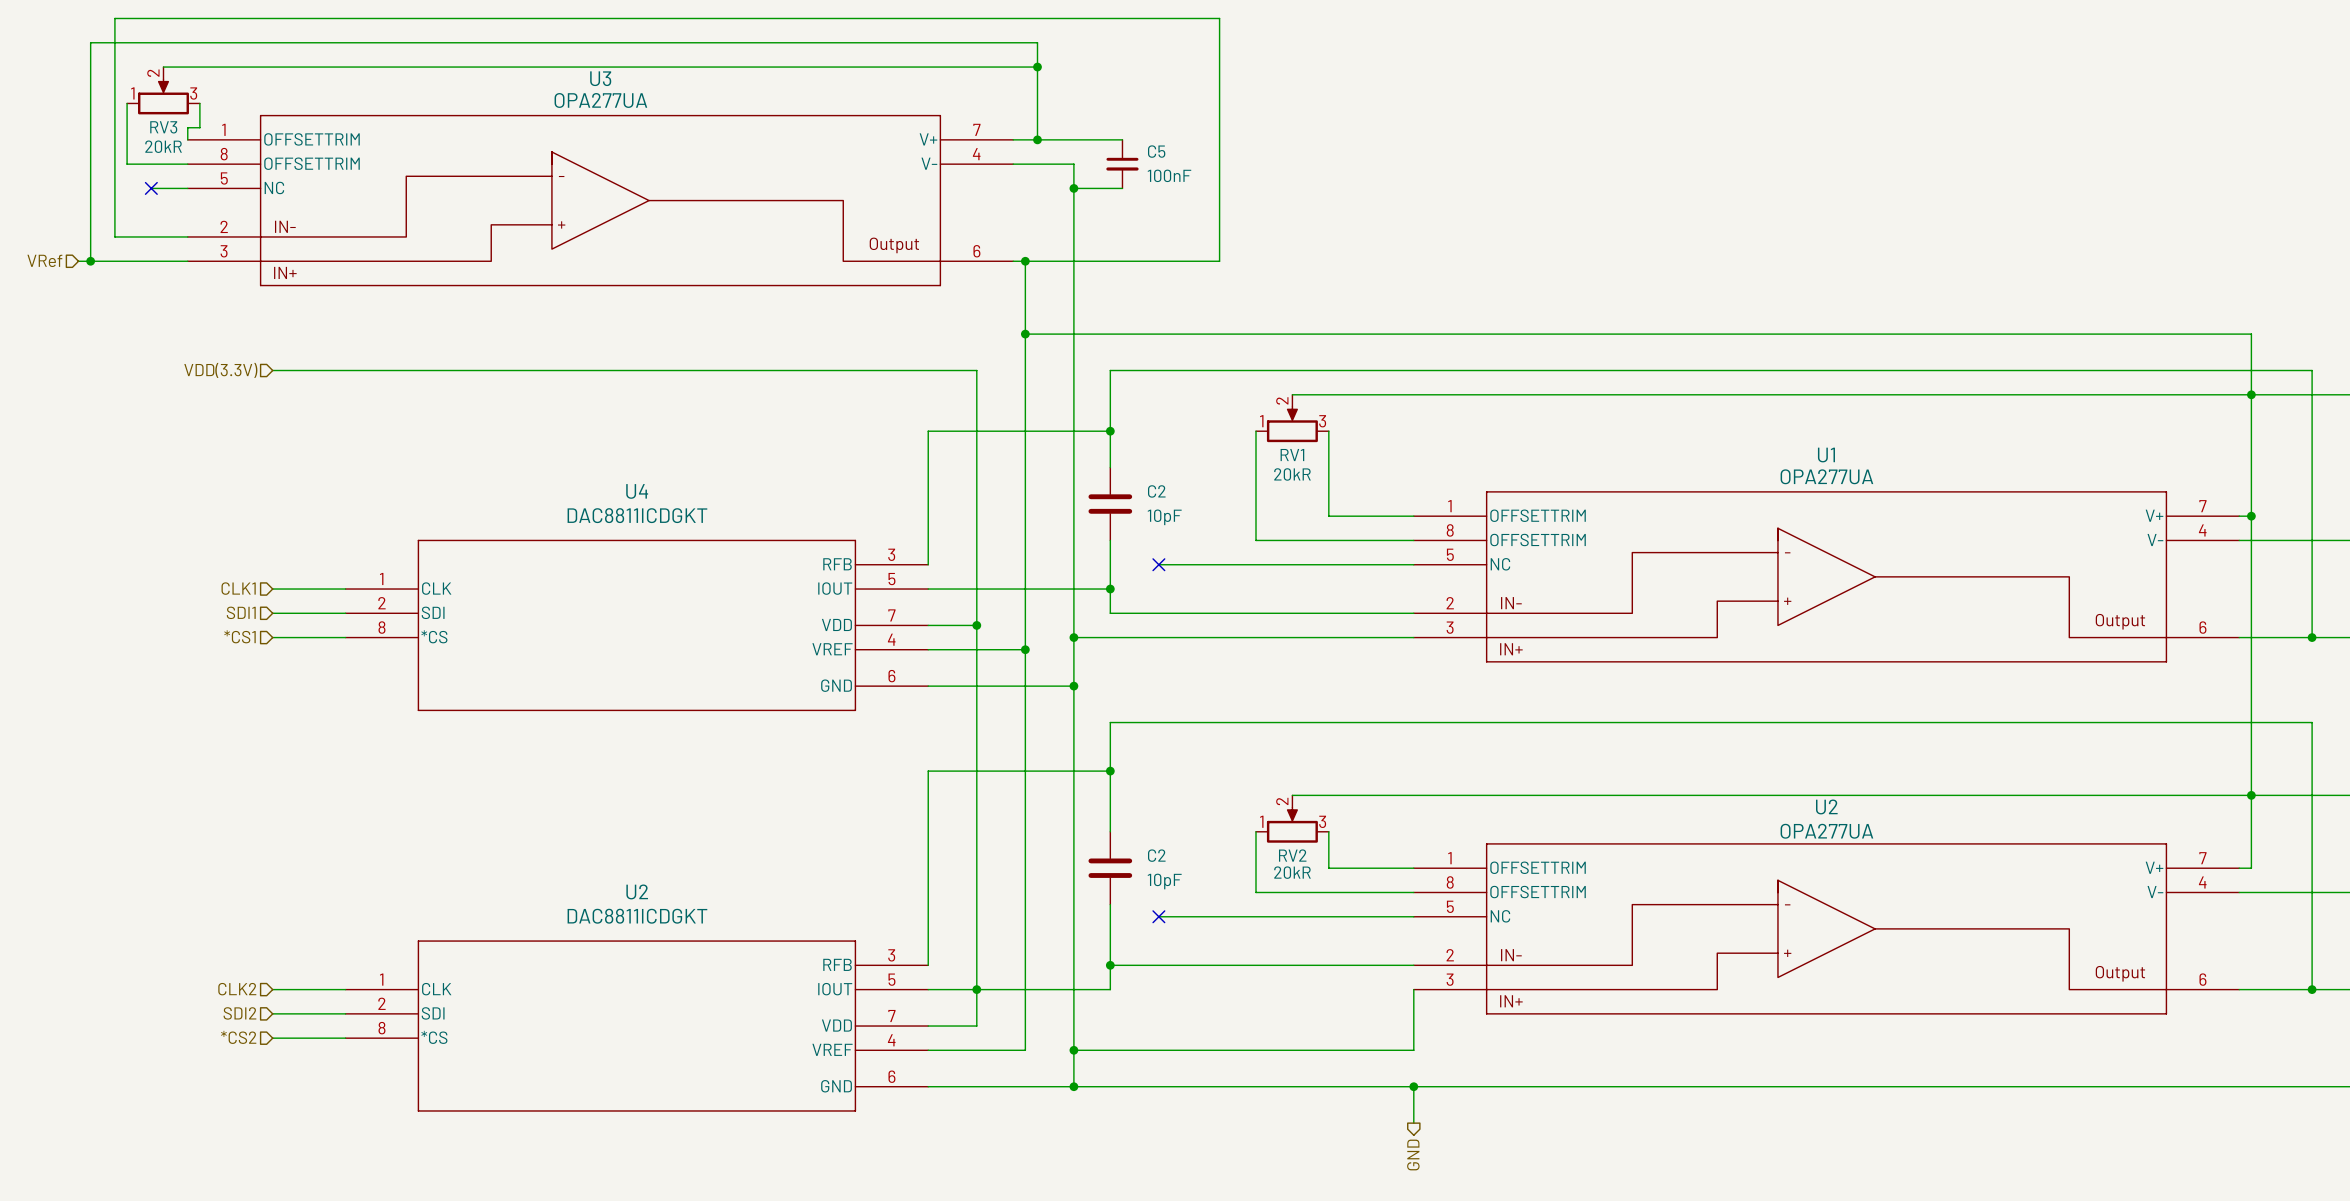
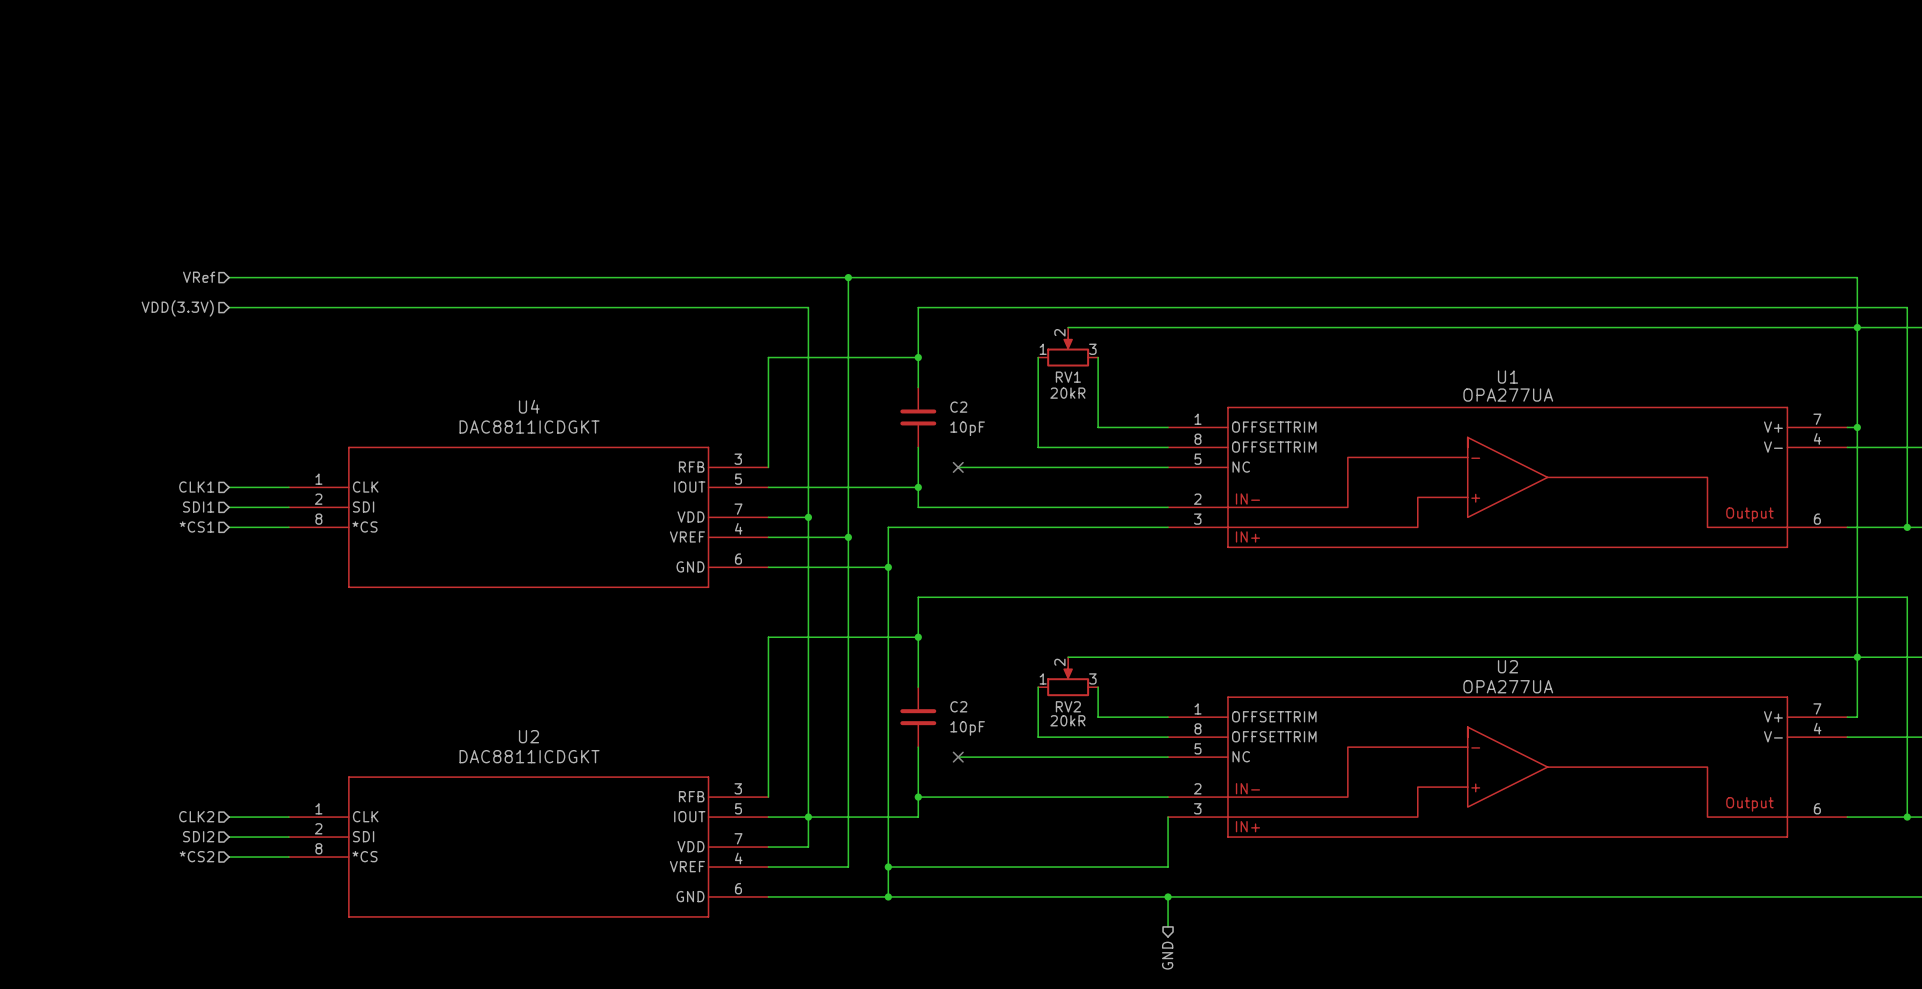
wire: (163, 67) (1037, 67) -> none
junction: (1037, 67) -> none
RV3: 20kR (163, 90) -> none
wire: (127, 103) (127, 164) (187, 164) -> none
wire: (199, 103) (199, 127) (187, 127) (187, 139) -> none
wire: (1013, 139) (1122, 139) -> none
wire: (1037, 139) (1037, 42) (90, 42) (90, 261) -> none
junction: (1037, 139) -> none
wire: (1013, 164) (1073, 164) (1073, 637) -> none
C5: 100nF (1122, 164) -> none
wire: (151, 188) (187, 188) -> none
no-connect mark: (151, 188) -> none
wire: (1073, 188) (1122, 188) -> none
junction: (1073, 188) -> none
U3: OPA277UA (600, 200) -> none
wire: (187, 236) (114, 236) (114, 18) (1219, 18) (1219, 261) (1013, 261) -> none
hierarchical label position: VRef (44, 260) -> VRef (199, 277)
wire: (78, 261) (187, 261) -> none
junction: (90, 261) -> none
wire: (1025, 261) (1025, 334) -> (228, 277) (848, 277)
junction: (1025, 261) -> none
junction: (1073, 637) -> none

